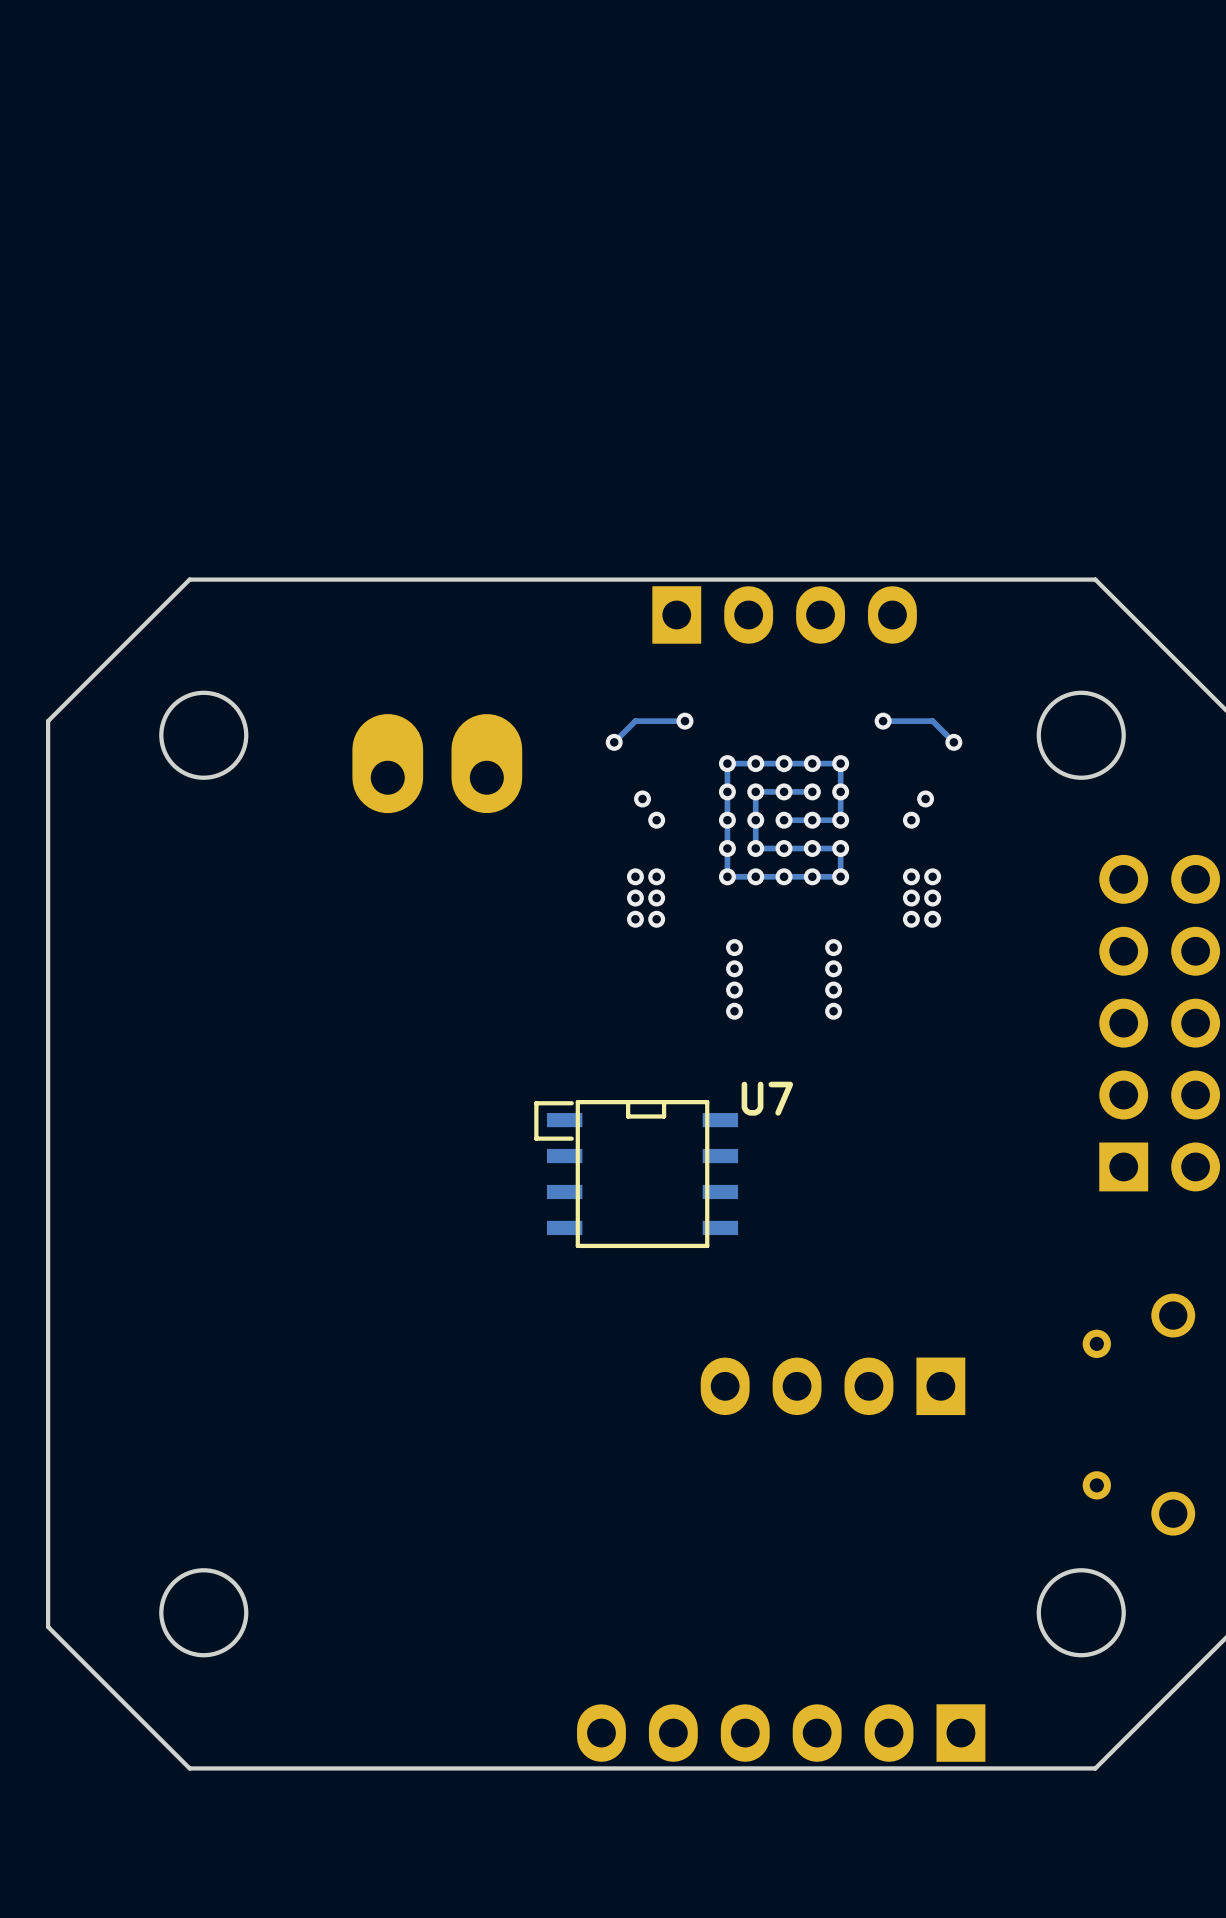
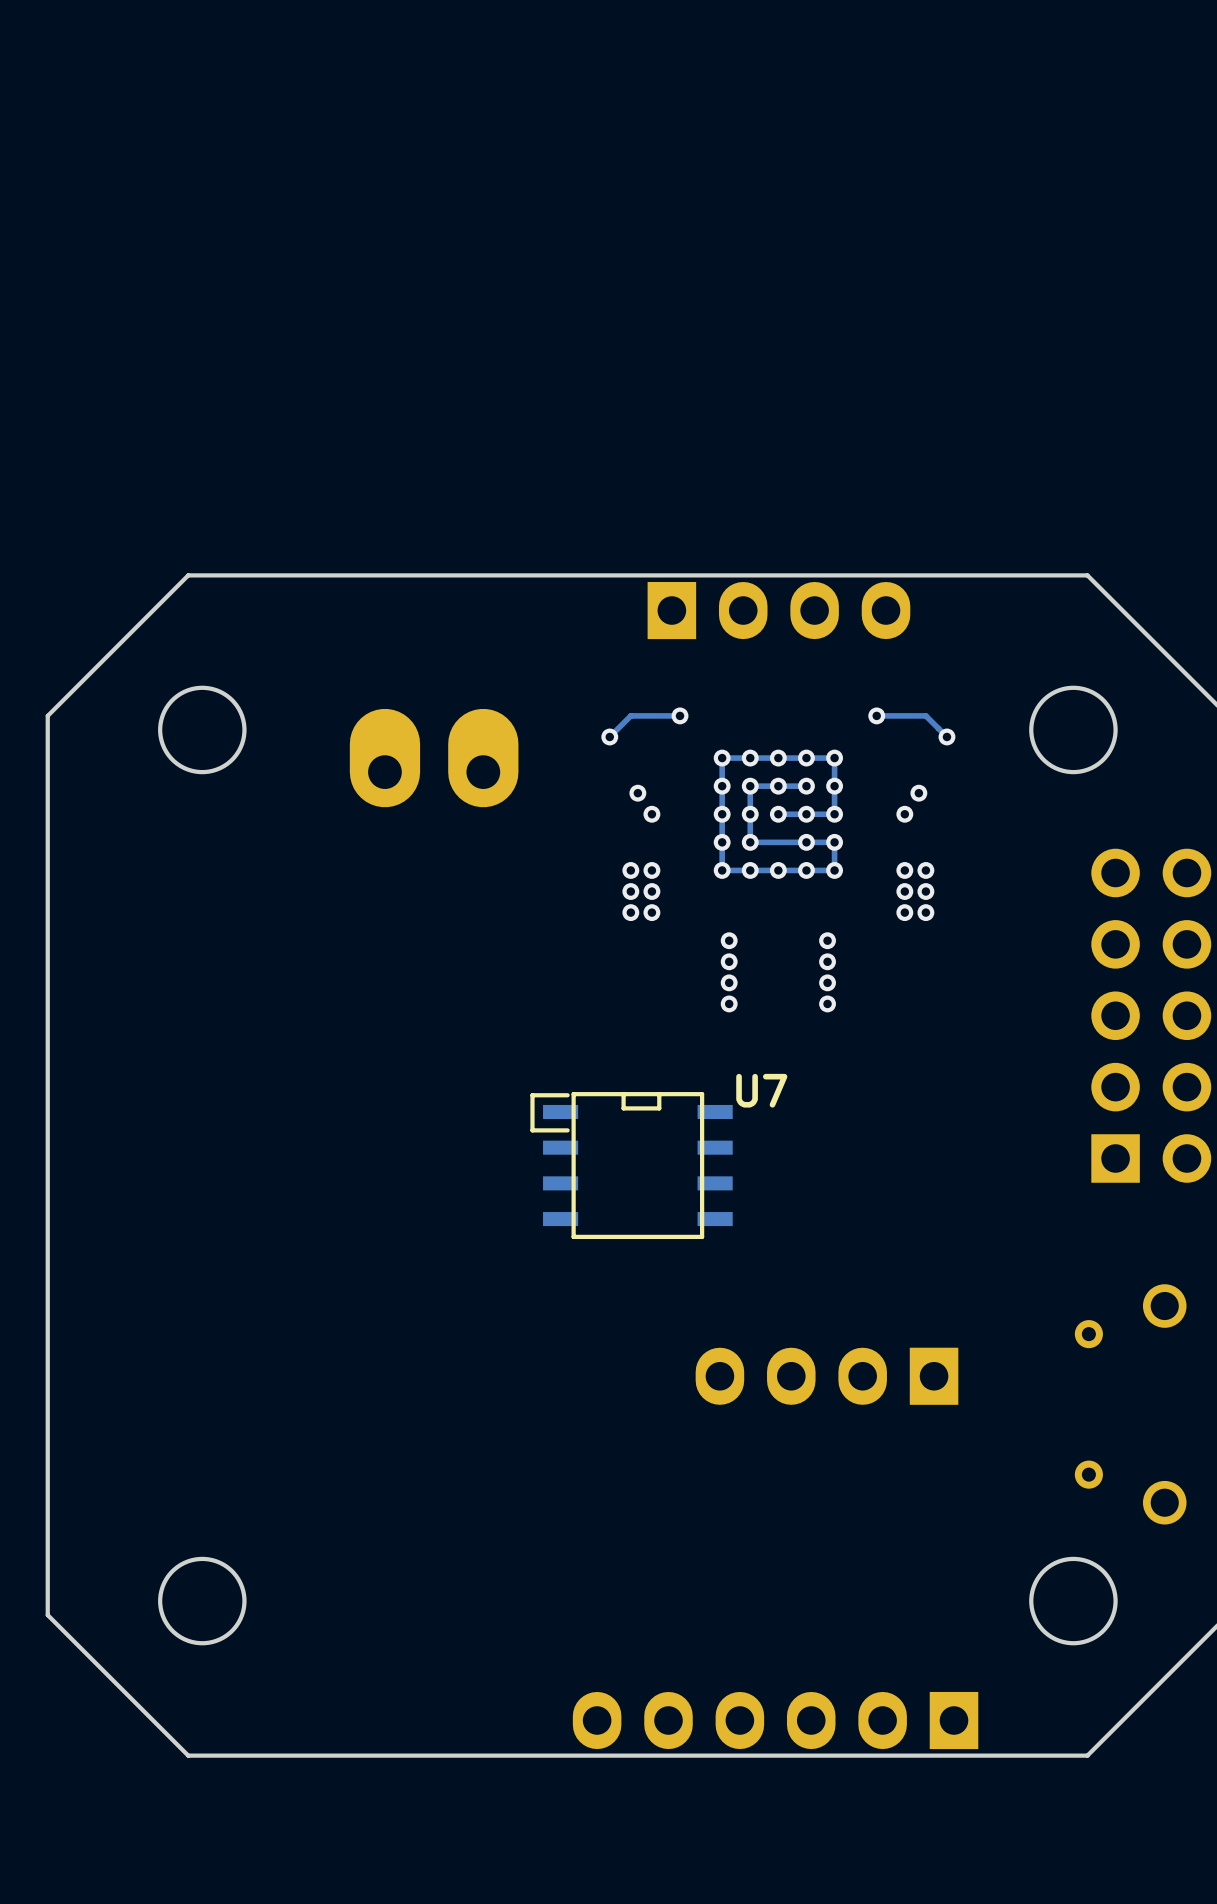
via: (784, 848) -> none

